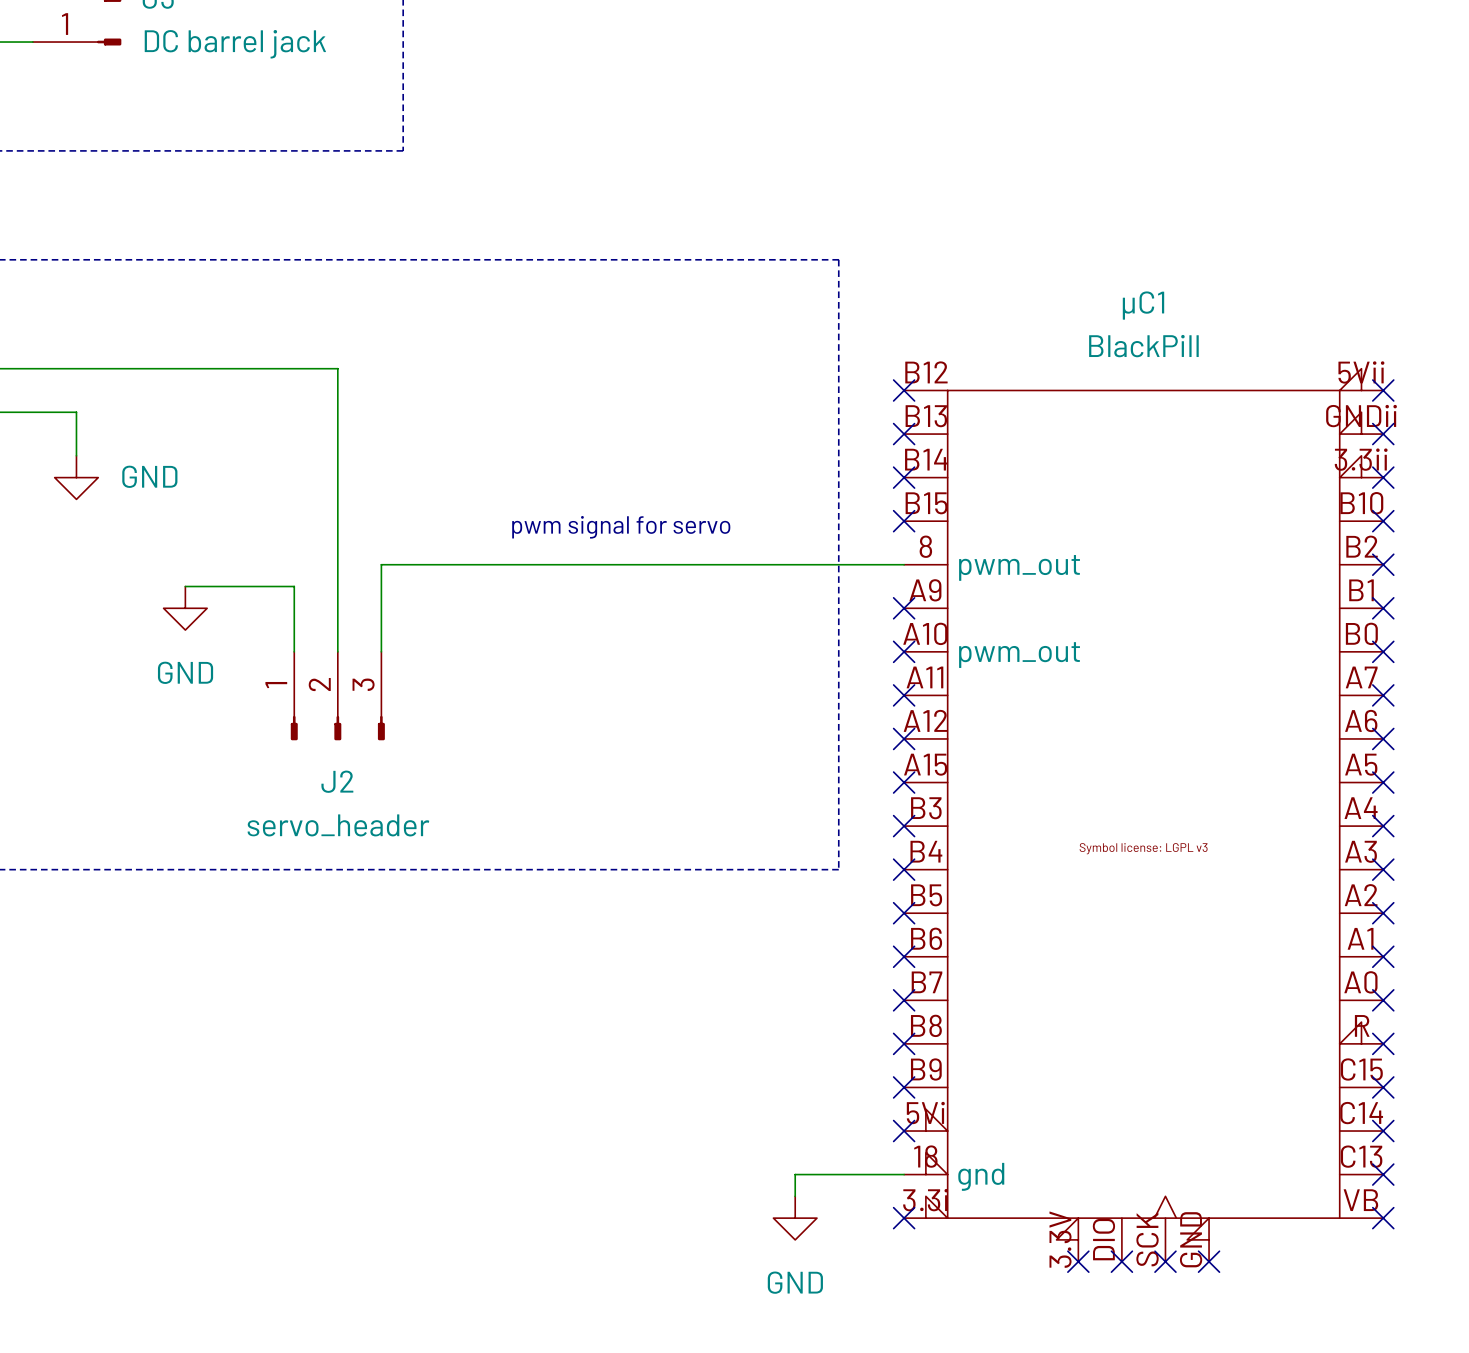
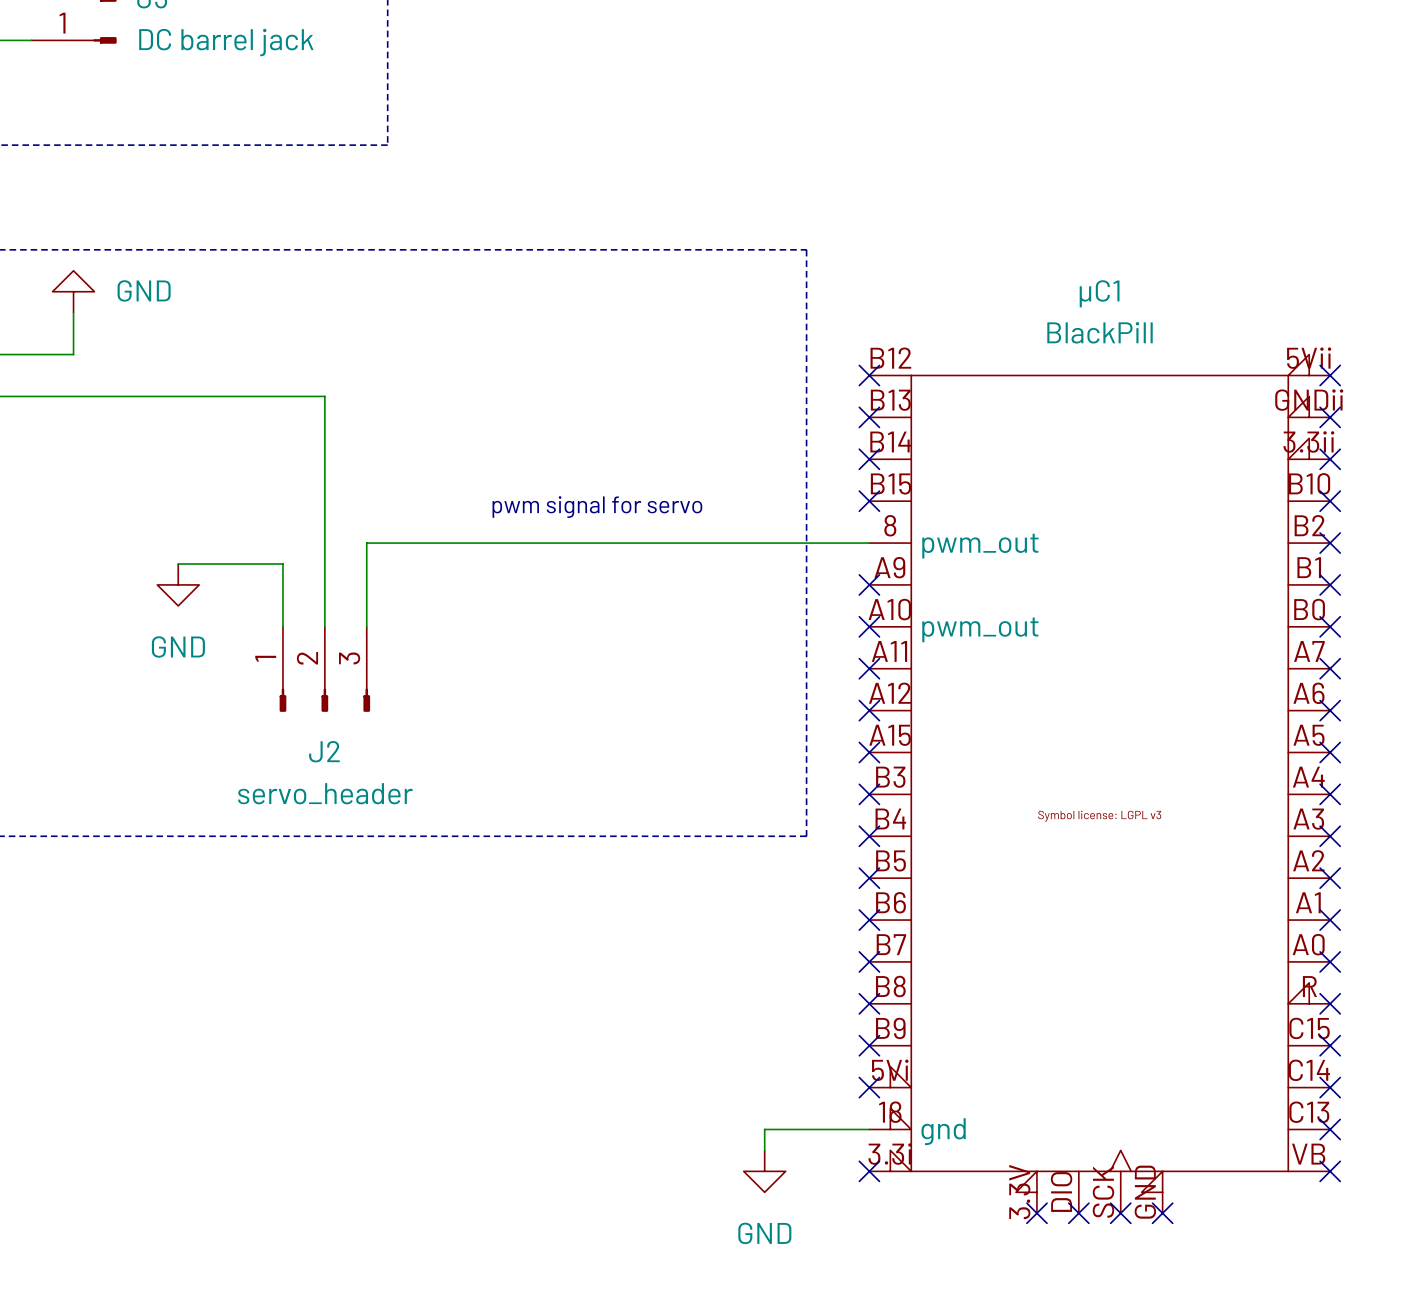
wire: (76, 368) (337, 368) (337, 412) -> (73, 396) (324, 396)
wire: (76, 412) (76, 455) -> (73, 312) (73, 354)
power symbol rotation: 0° (76, 477) -> 180° (73, 291)
power symbol position: GND (76, 477) -> GND (73, 291)

